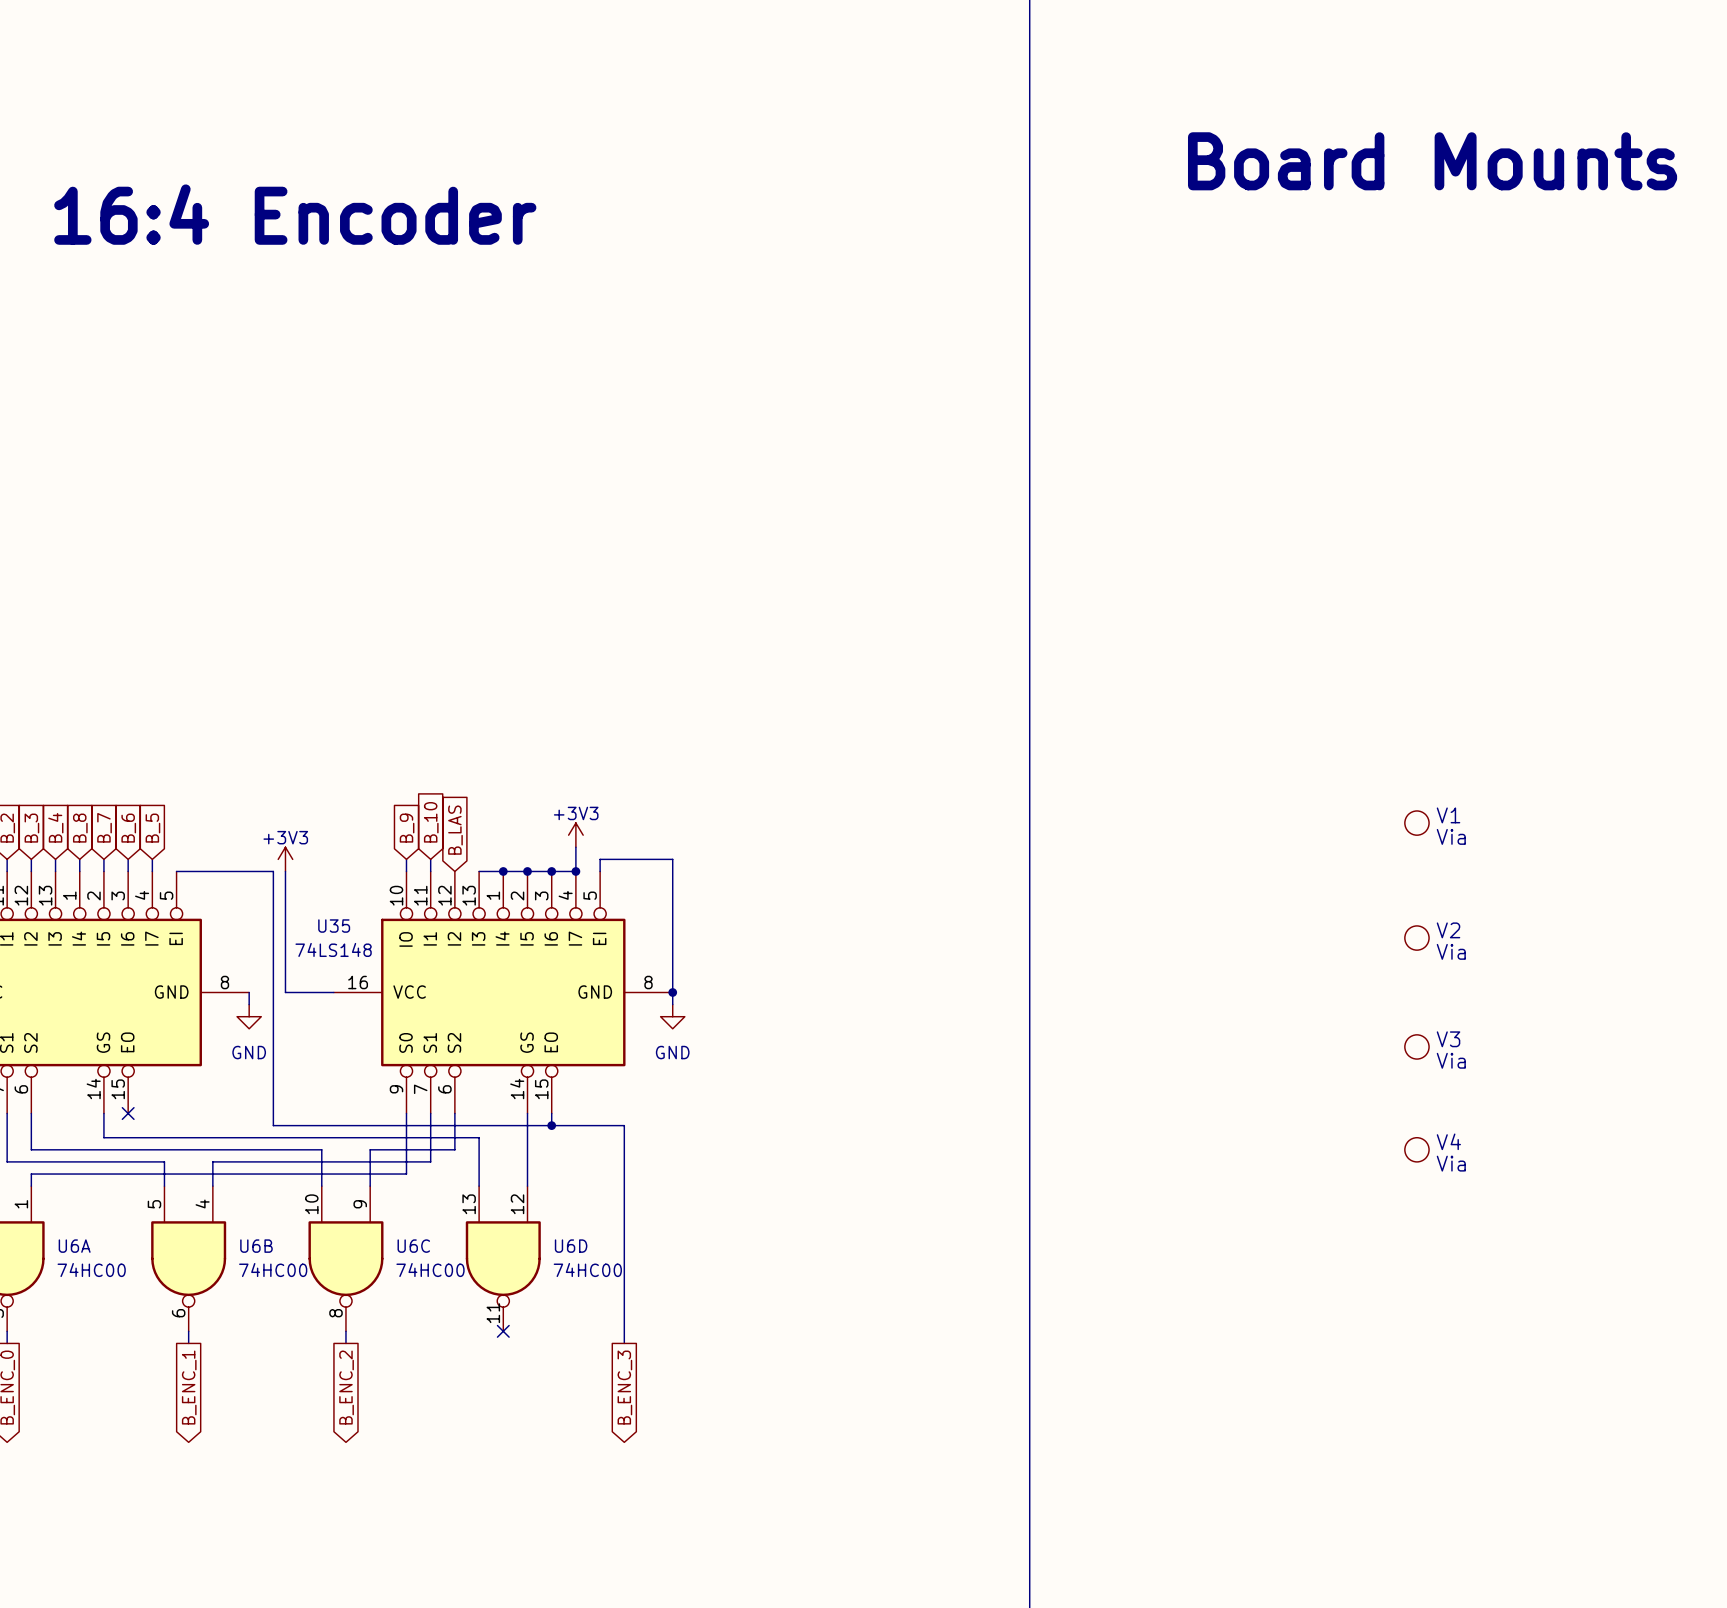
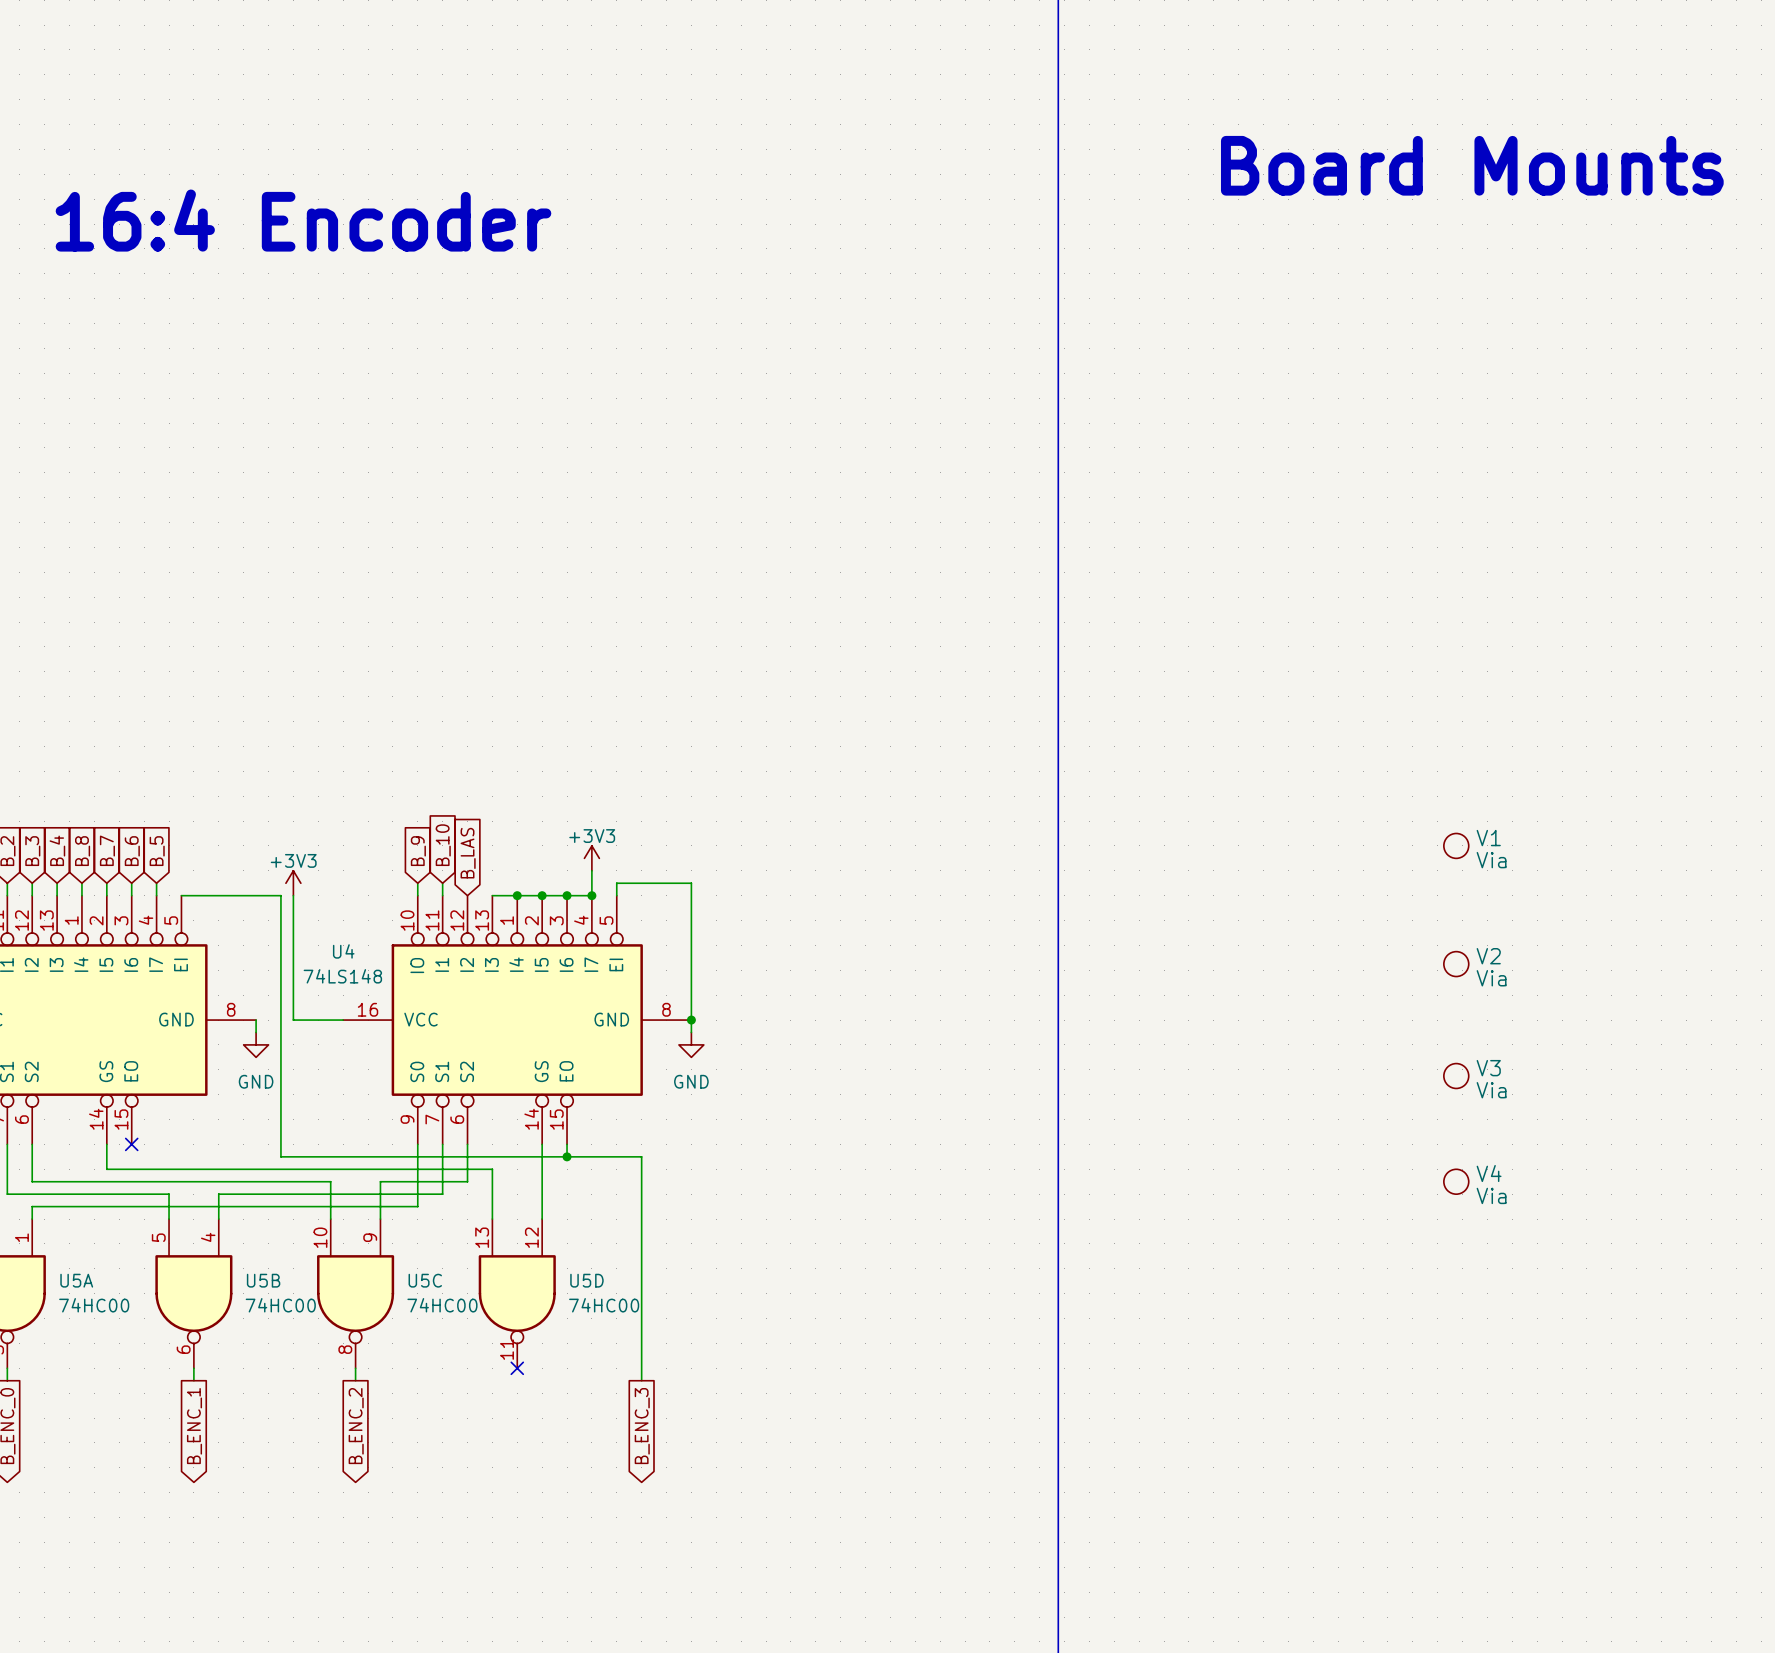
U35 name: U35 (334, 926) -> U4 (343, 951)
U6A name: U6A (74, 1246) -> U5A (76, 1280)
U6B name: U6B (256, 1246) -> U5B (263, 1280)
U6C name: U6C (413, 1246) -> U5C (425, 1280)
U6D name: U6D (571, 1246) -> U5D (586, 1280)

